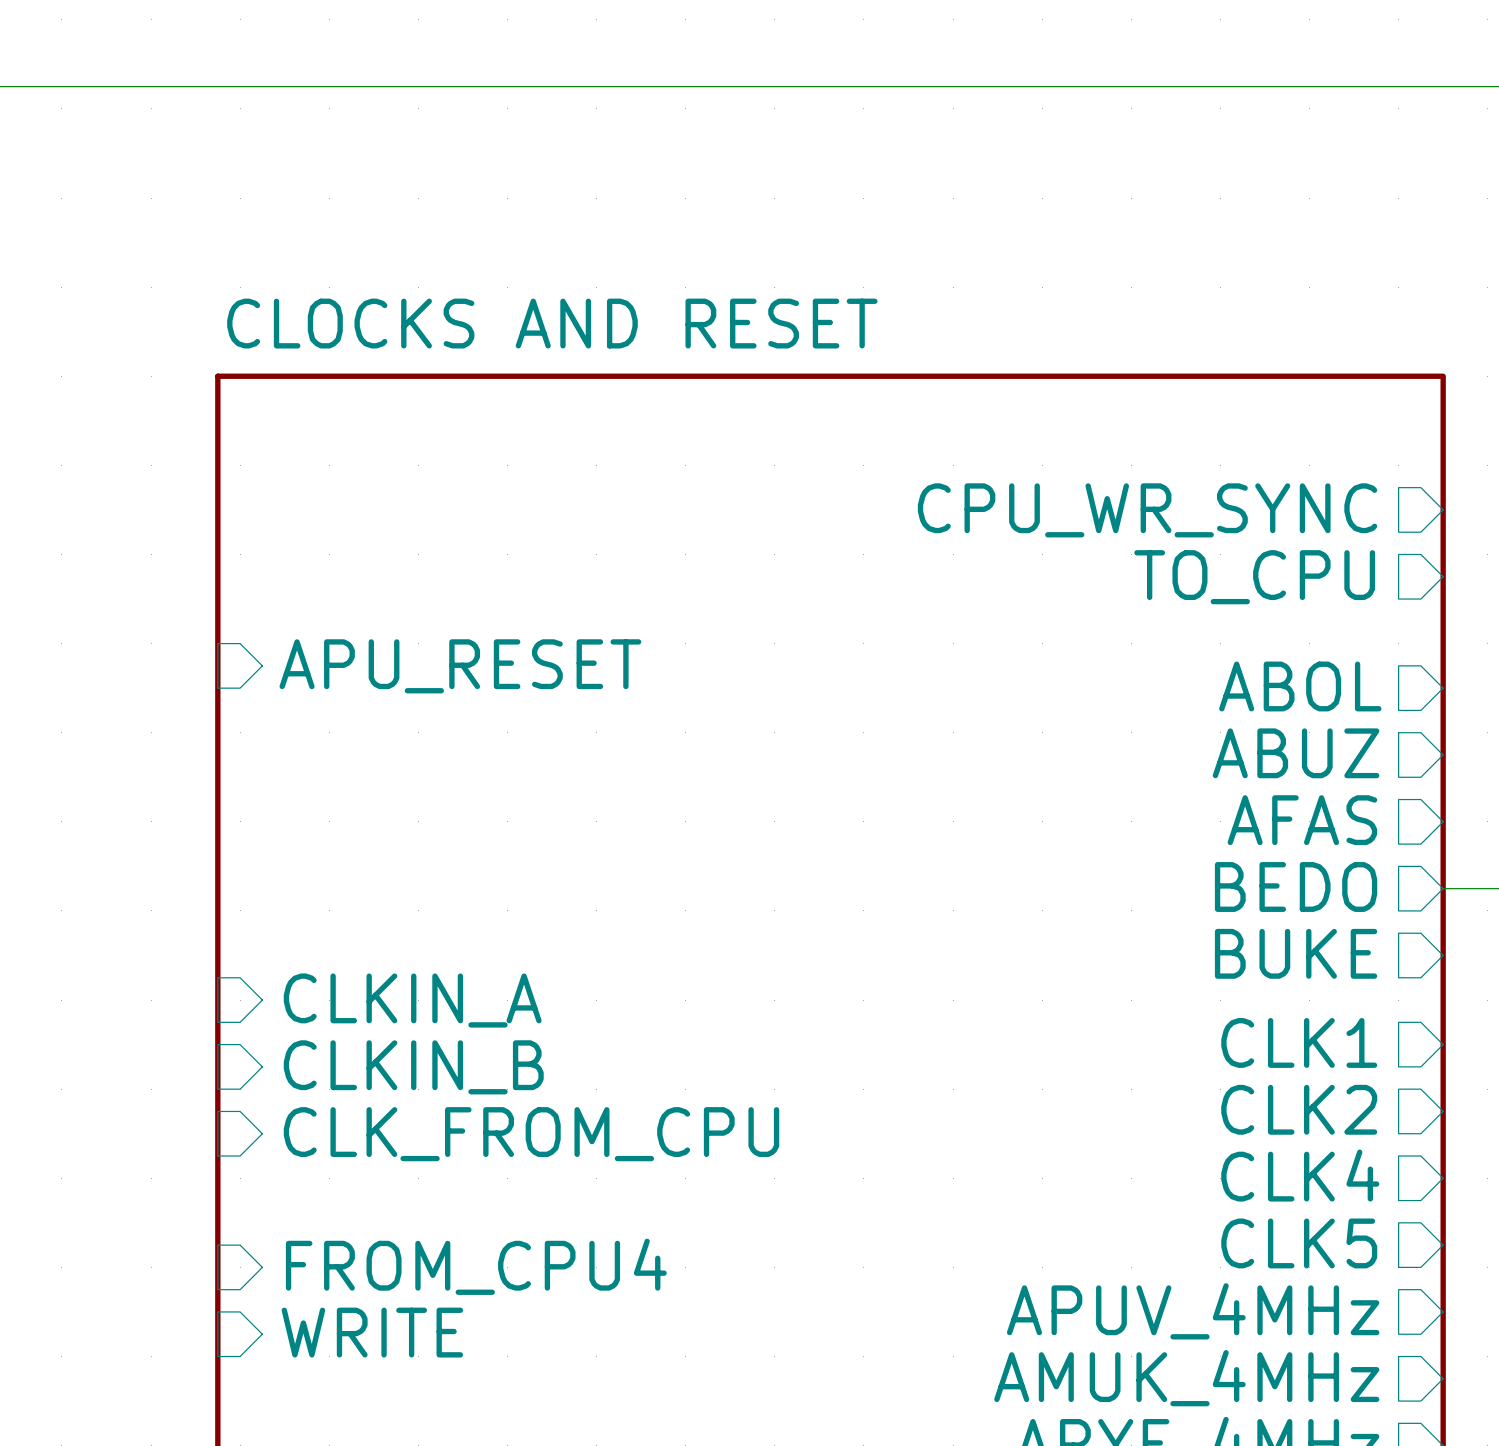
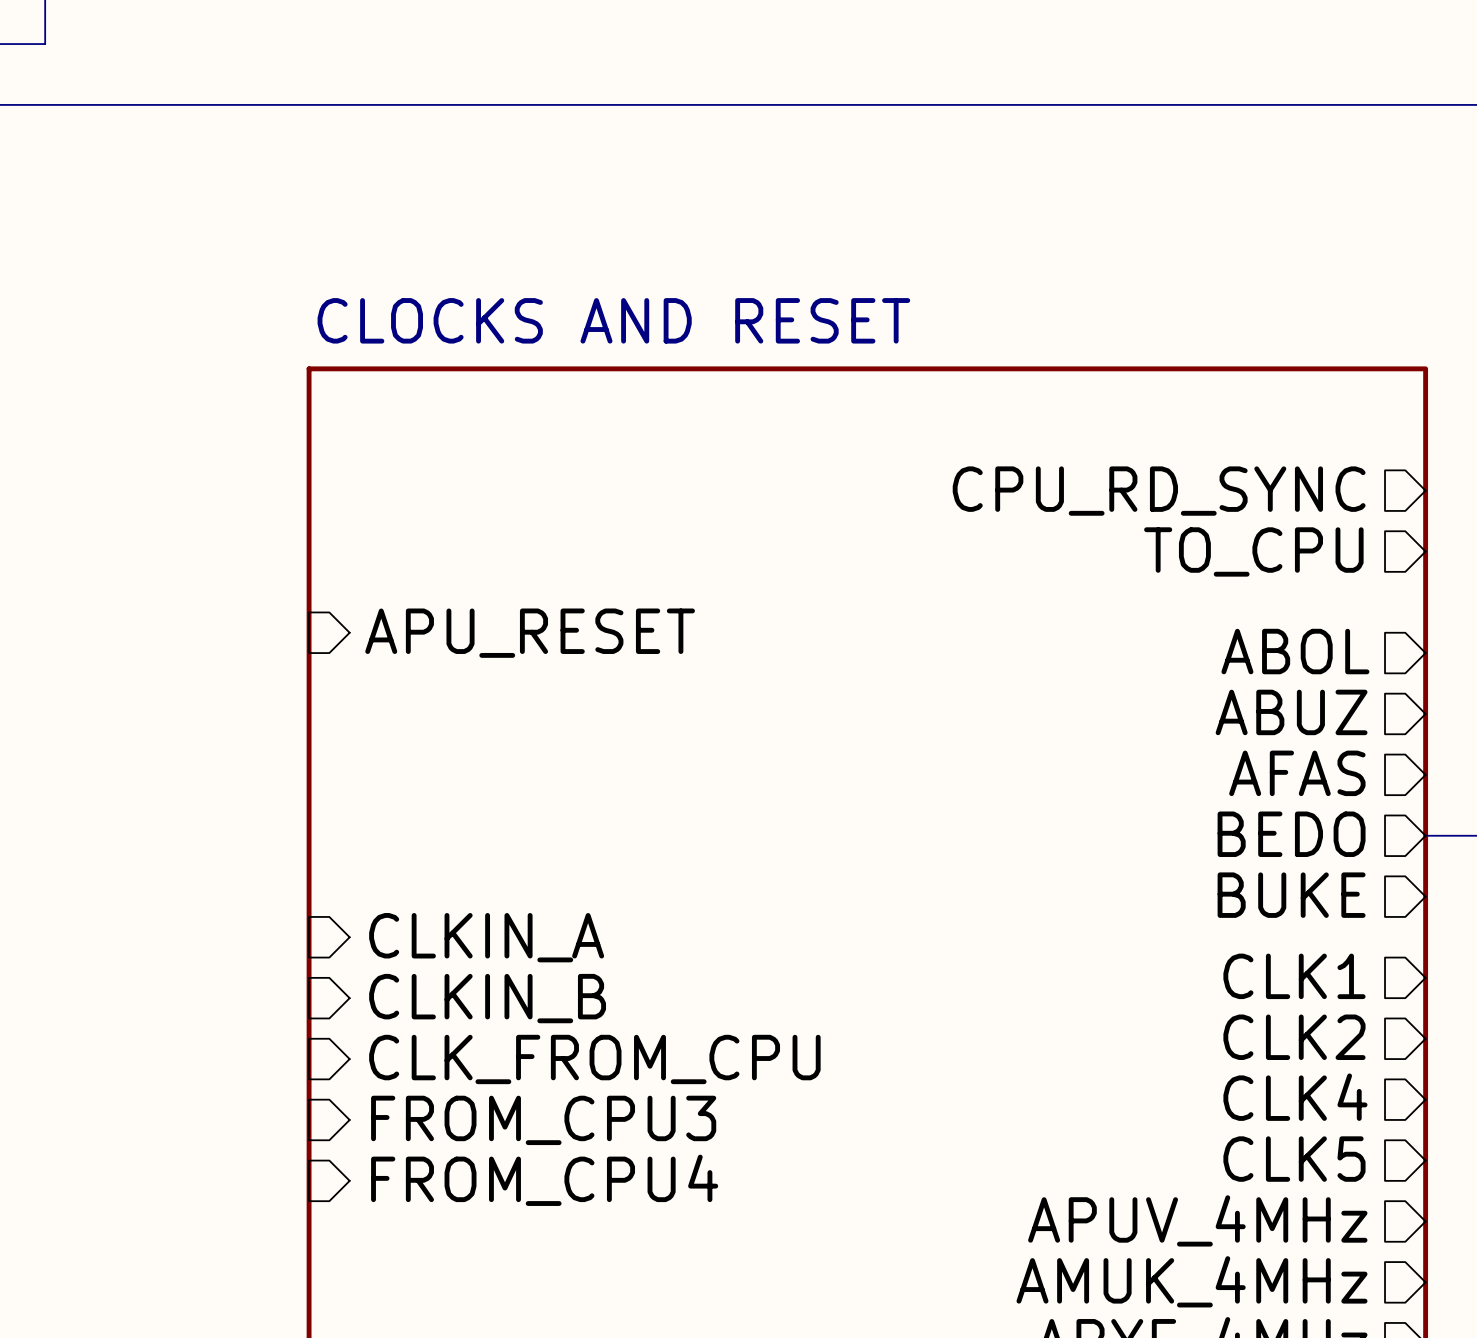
sheet pin: CPU_WR_SYNC (1147, 510) -> CPU_RD_SYNC (1159, 491)
sheet pin: none -> FROM_CPU3 (543, 1120)
sheet pin: WRITE (372, 1332) -> none

